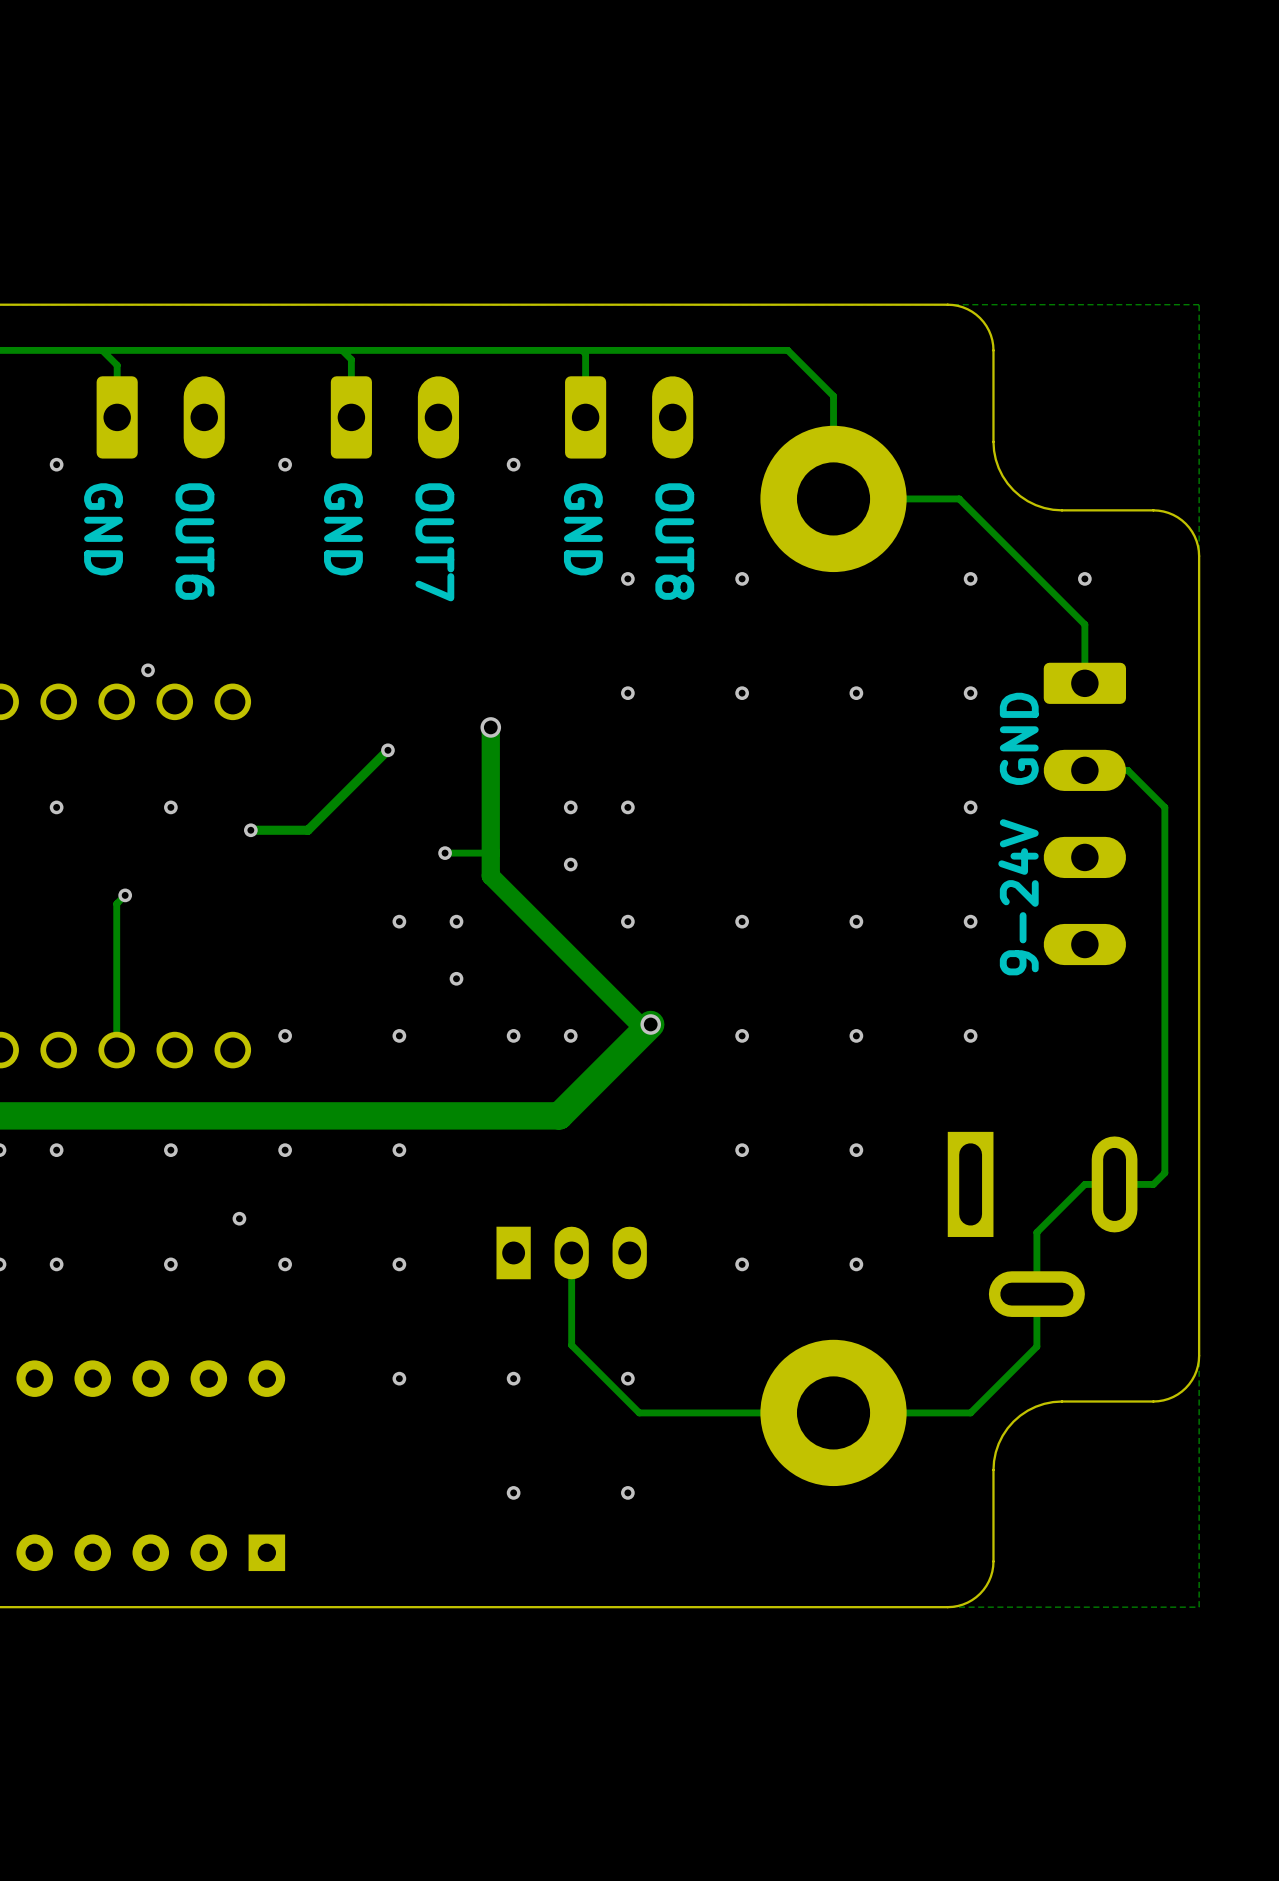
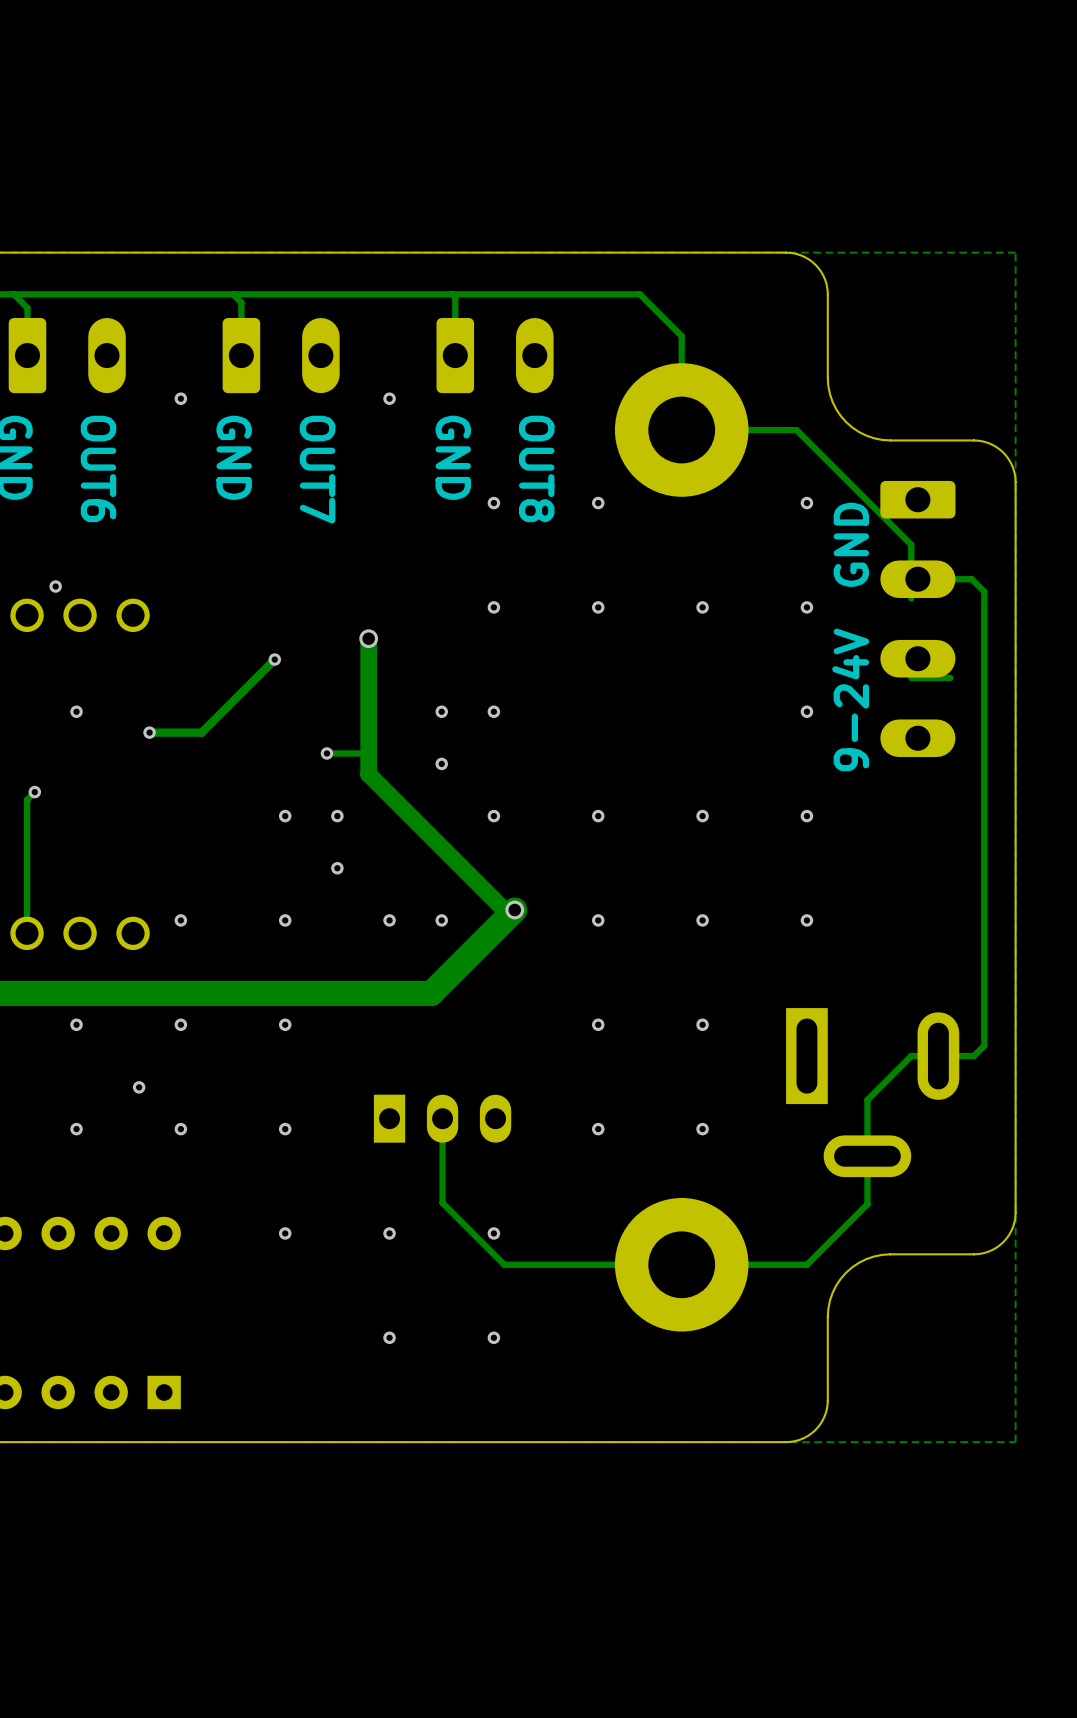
via: (1084, 578) -> none
text position: GND (1019, 738) -> GND (851, 544)
track: (1127, 770) (1164, 807) -> (917, 579) (971, 579) (984, 591) (984, 711)
part position: (1084, 813) -> (917, 618)
text position: 9-24V (1018, 897) -> 9-24V (850, 699)

